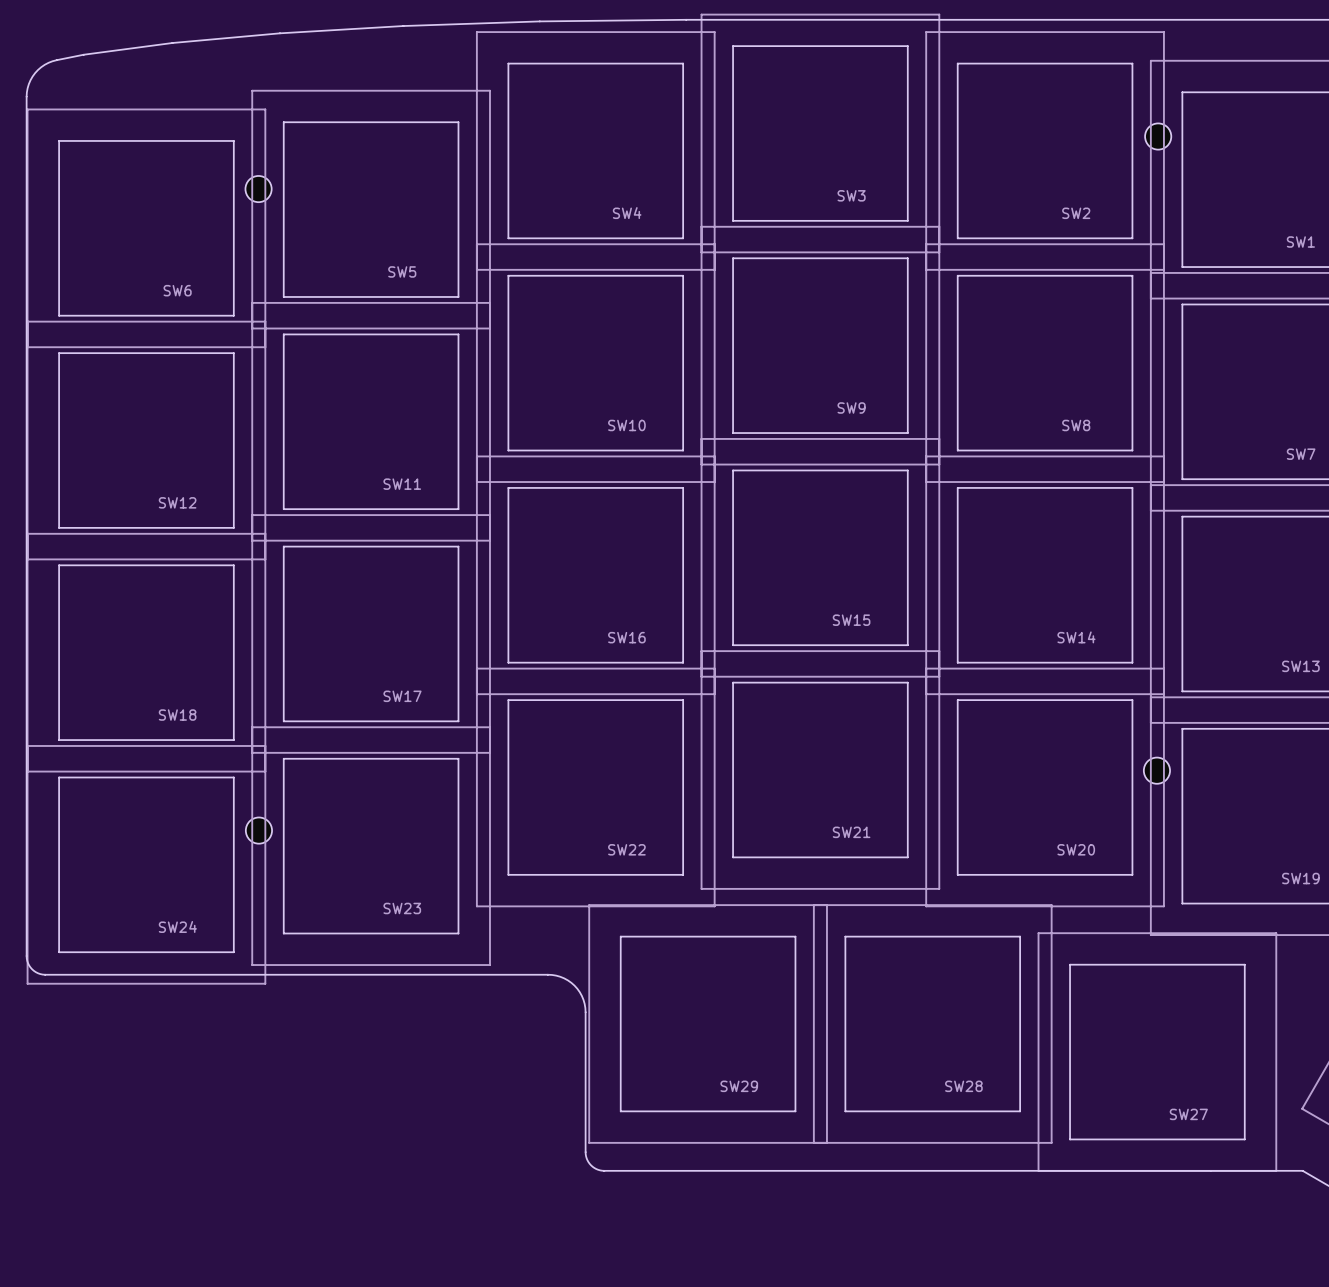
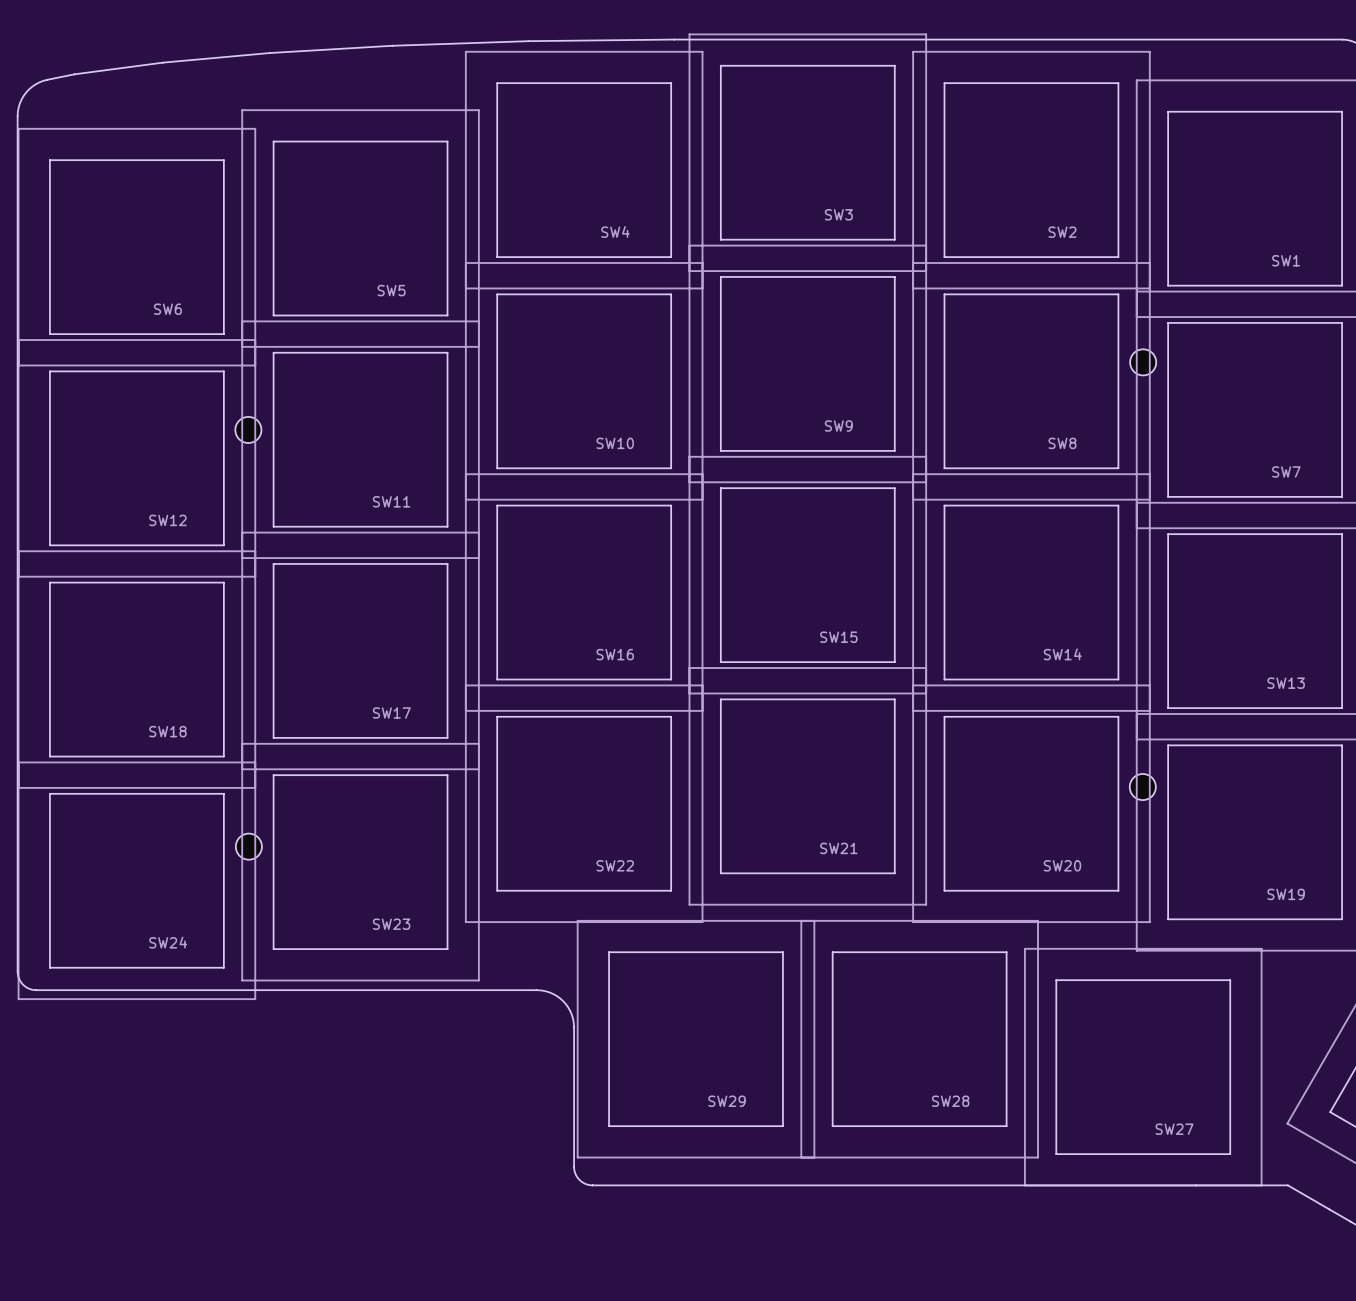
part position: (1158, 136) -> (1143, 362)
part position: (258, 189) -> (248, 429)

